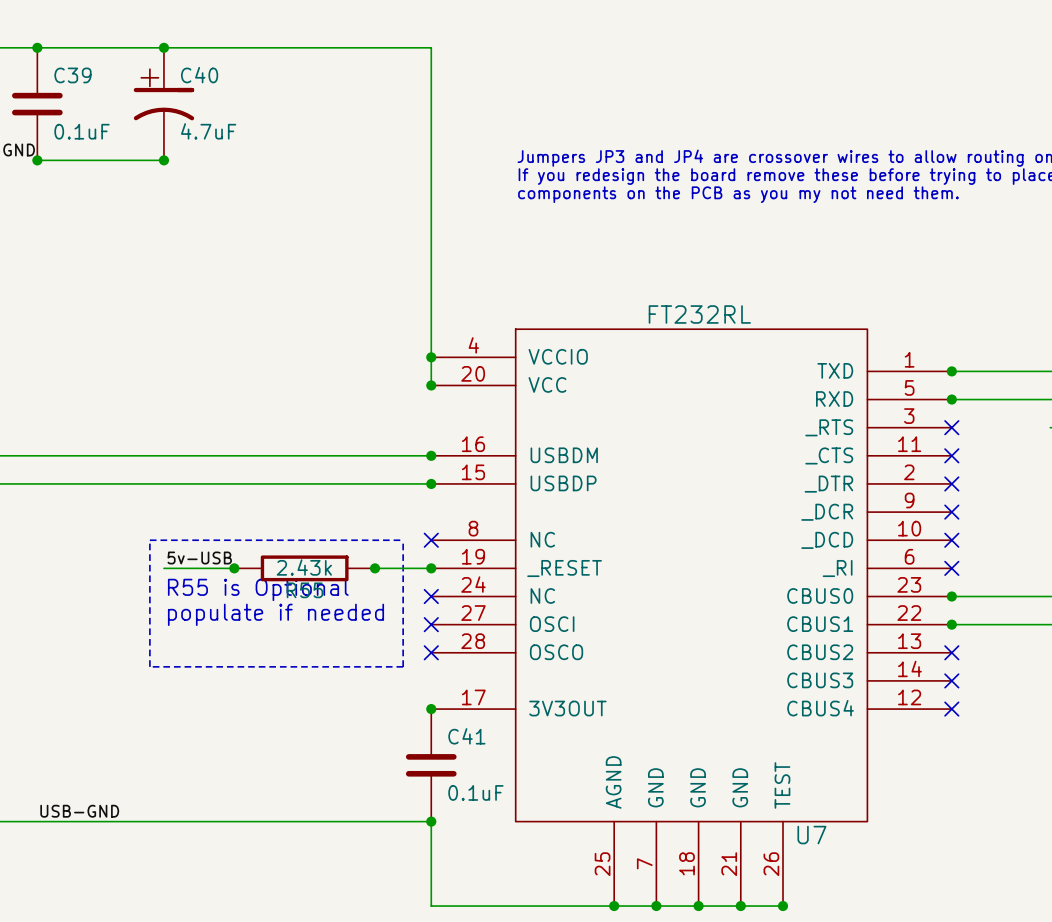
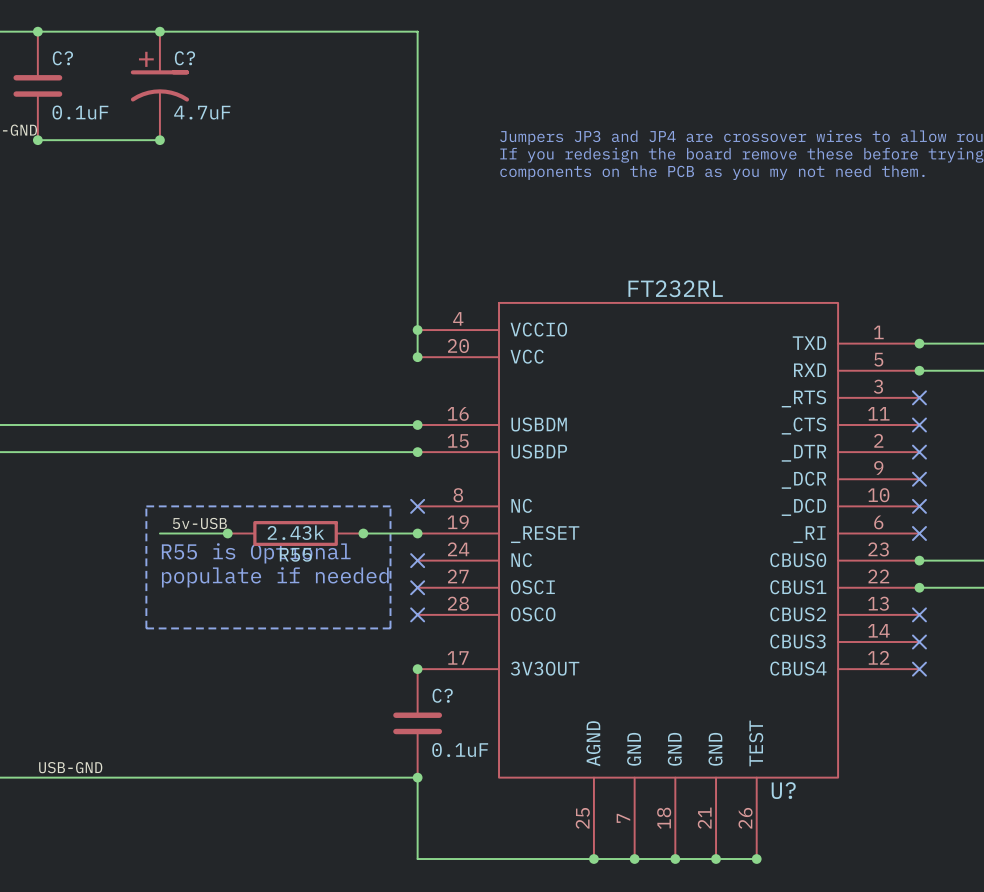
C39 name: C39 (72, 75) -> C? (62, 58)
C40 name: C40 (199, 75) -> C? (184, 58)
C41 name: C41 (466, 736) -> C? (442, 695)
U7 name: U7 (811, 835) -> U? (783, 790)

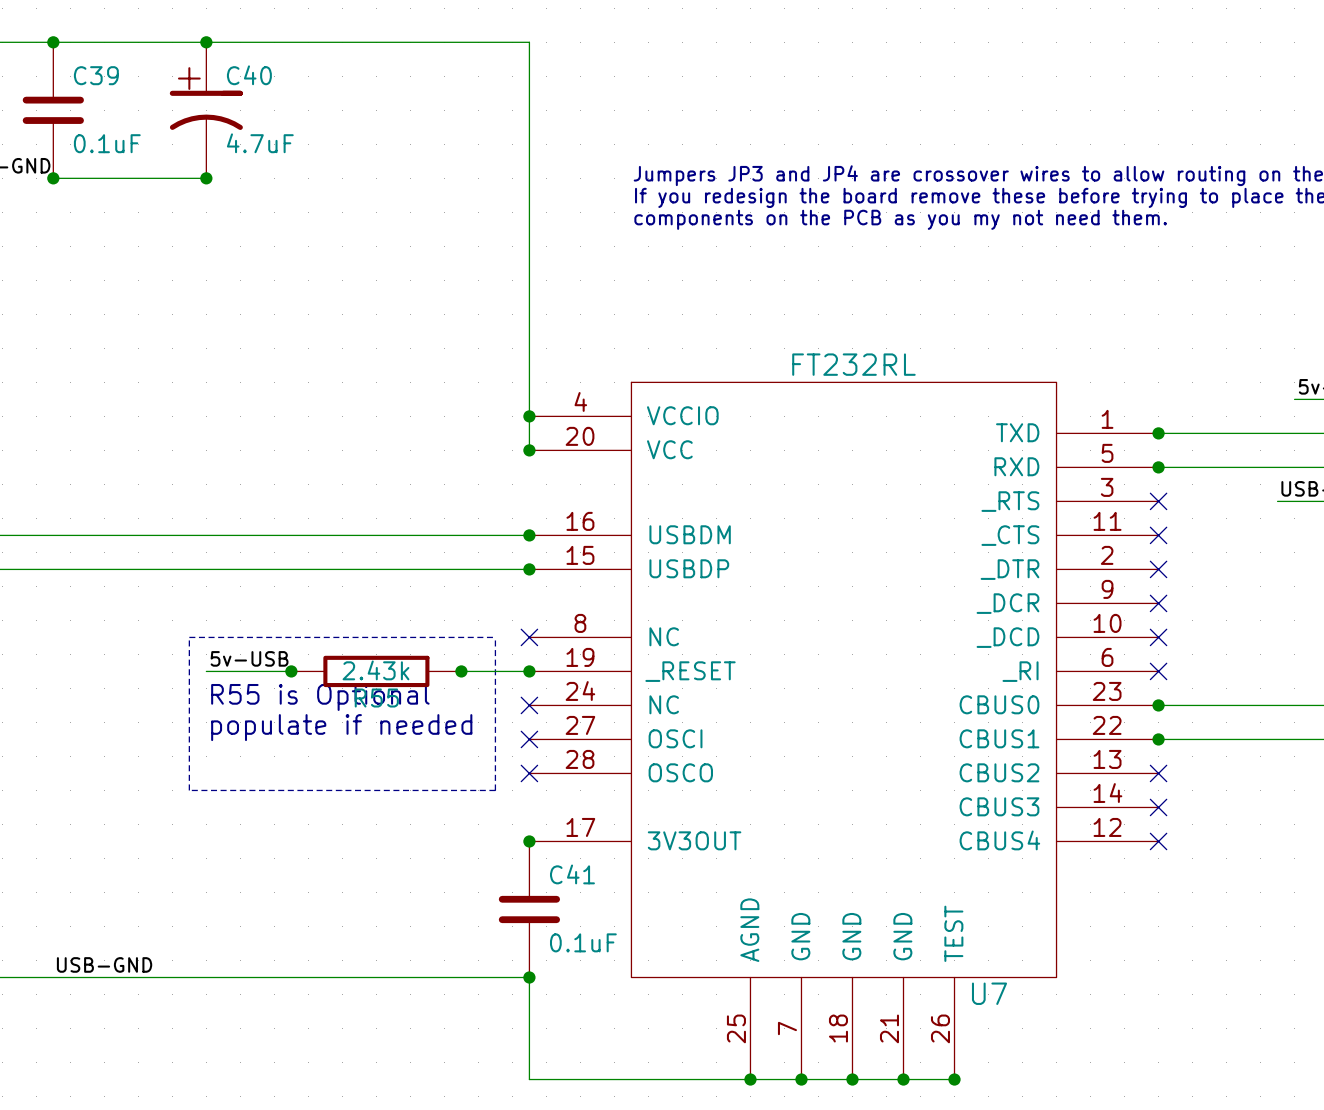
C? name: C? (62, 58) -> C39 (96, 75)
C? name: C? (184, 58) -> C40 (249, 75)
C? name: C? (442, 695) -> C41 (572, 874)
U? name: U? (783, 790) -> U7 (989, 993)

